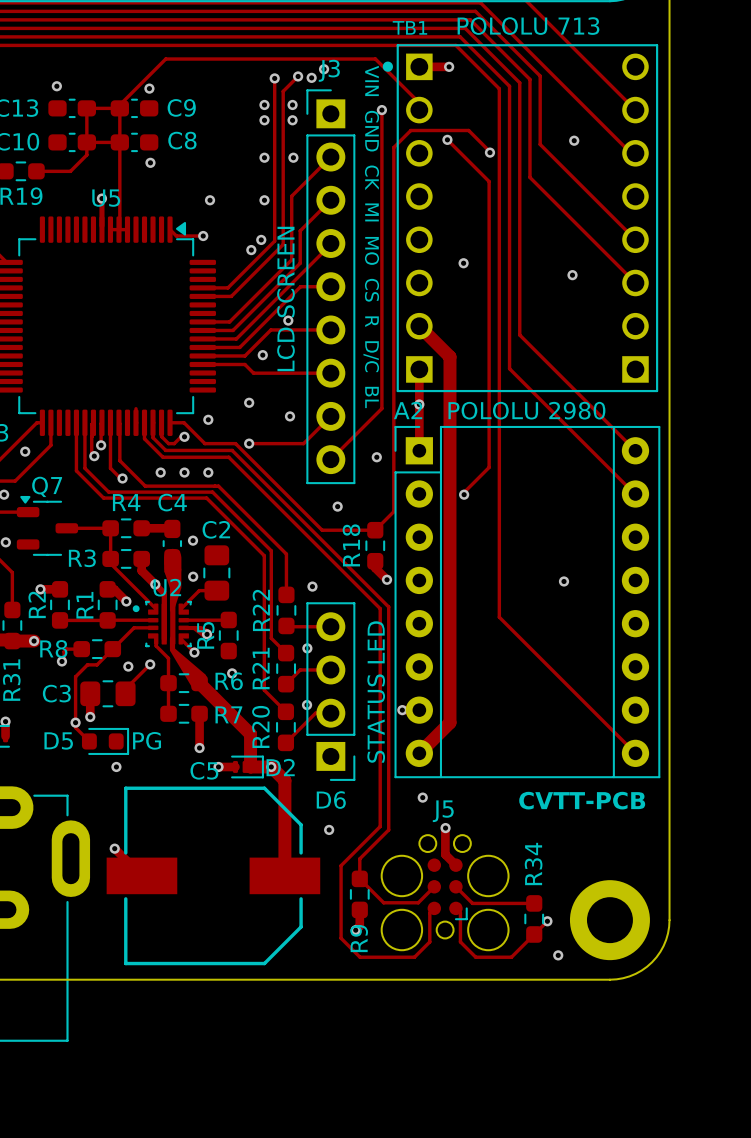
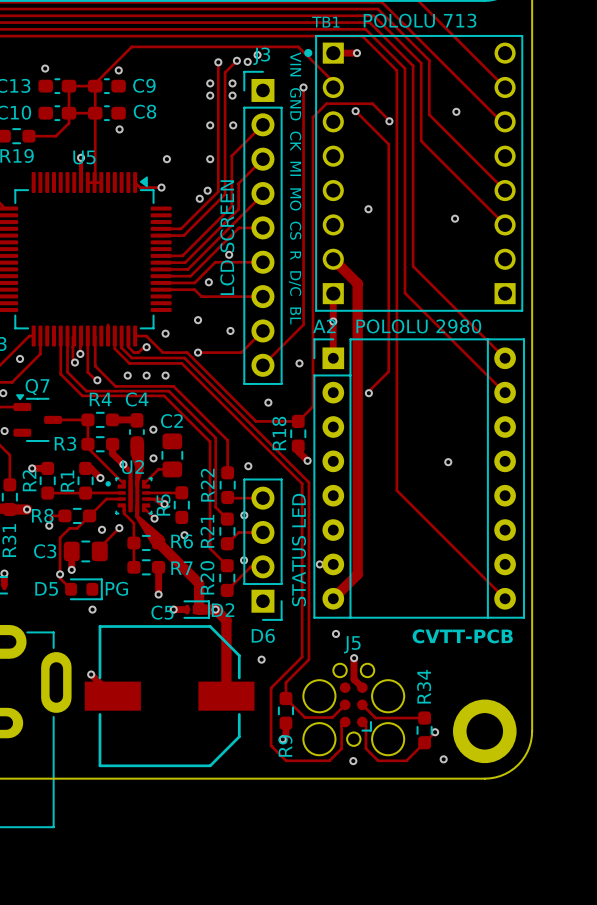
via: none -> (353, 761)

